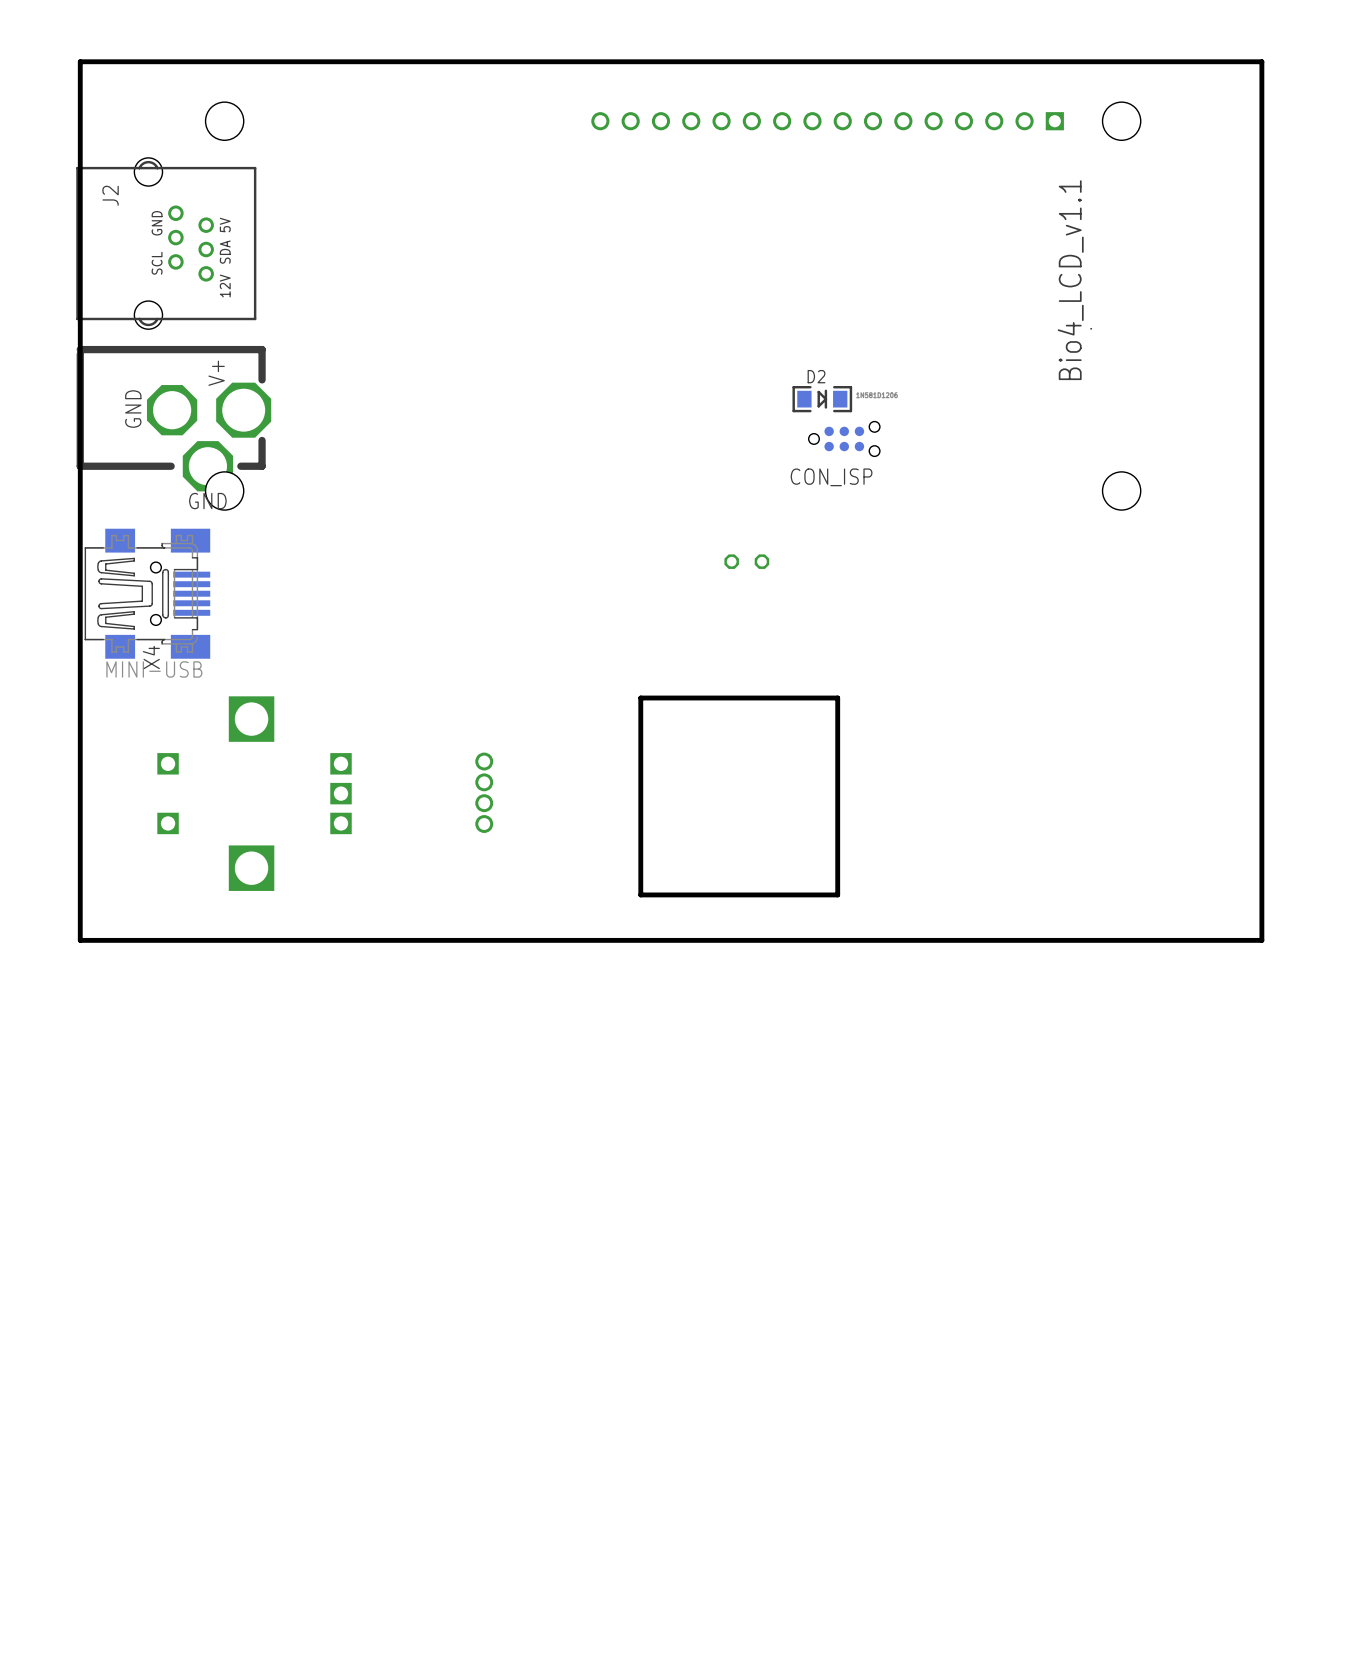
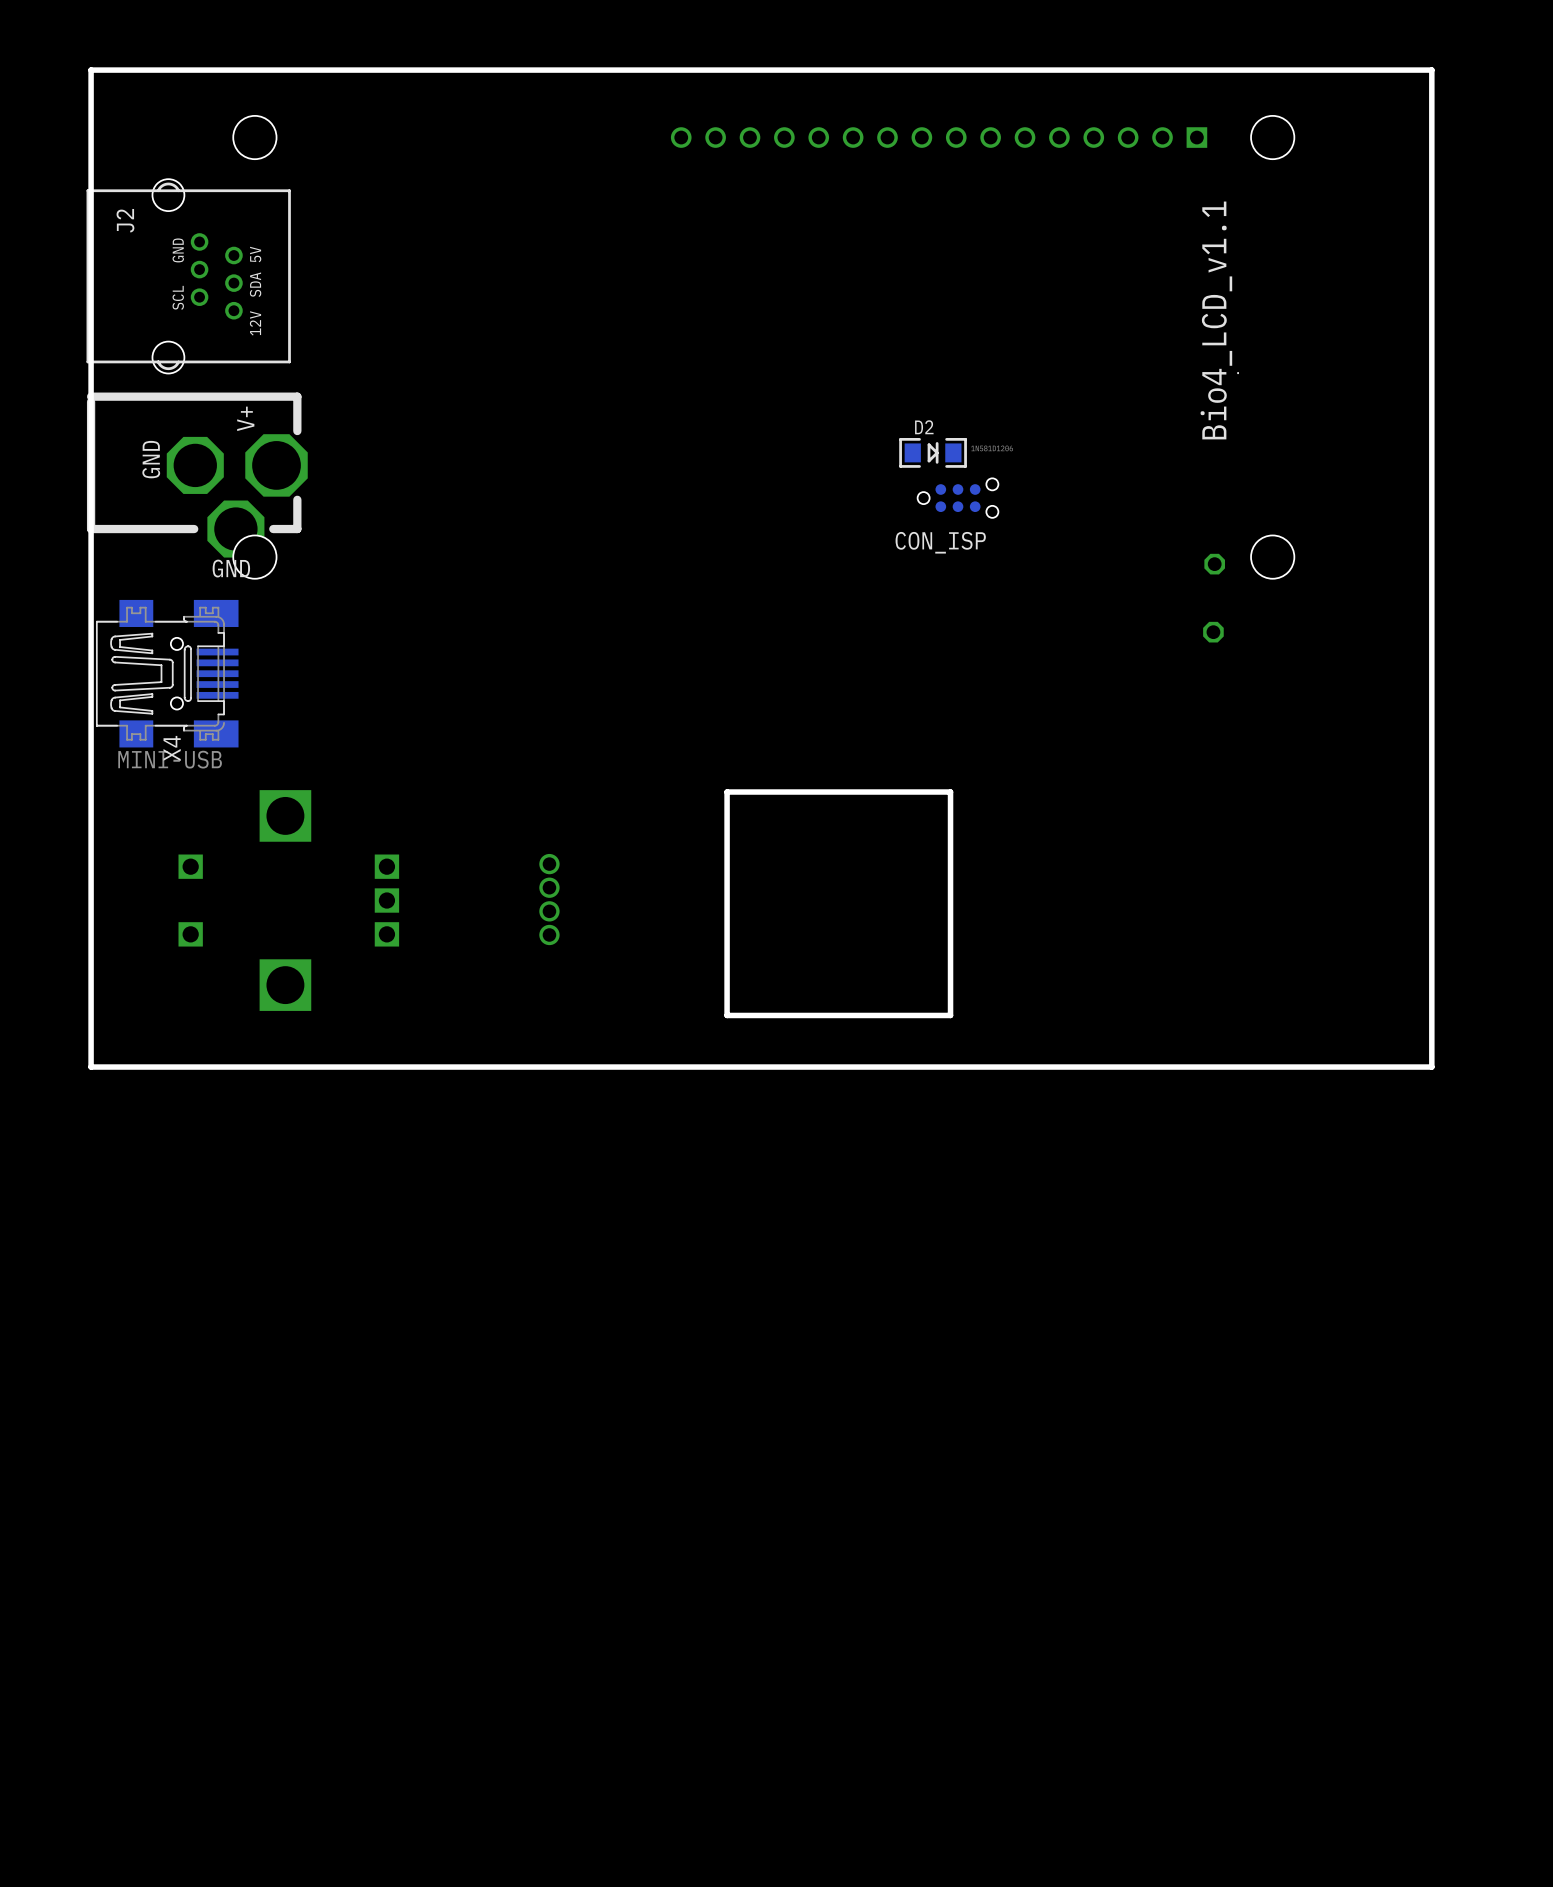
part: none -> (1214, 564)
part: none -> (1213, 632)
part: (746, 561) -> none

